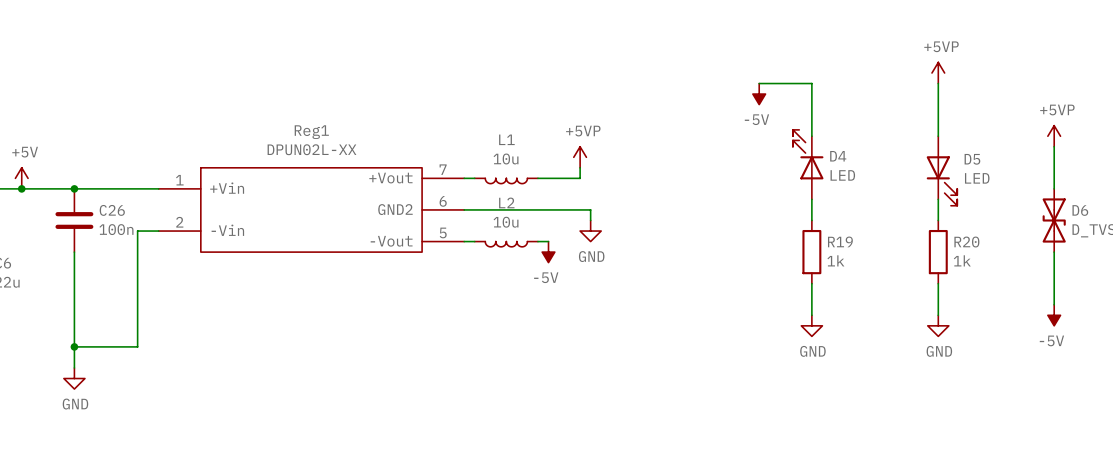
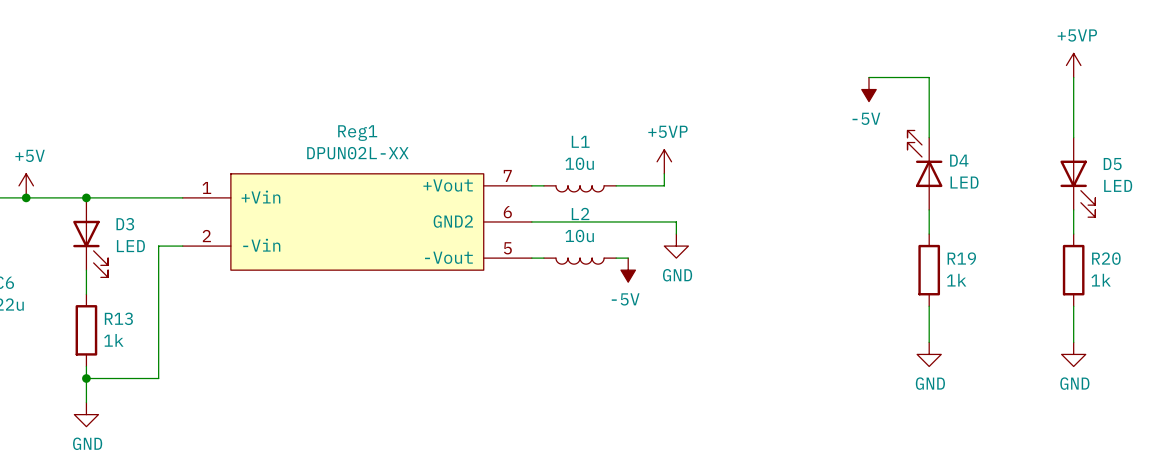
C26: 100n (74, 220) -> none
D3: none -> LED (90, 237)
wire: (74, 273) (74, 336) -> none
R13: none -> 1k (86, 330)

